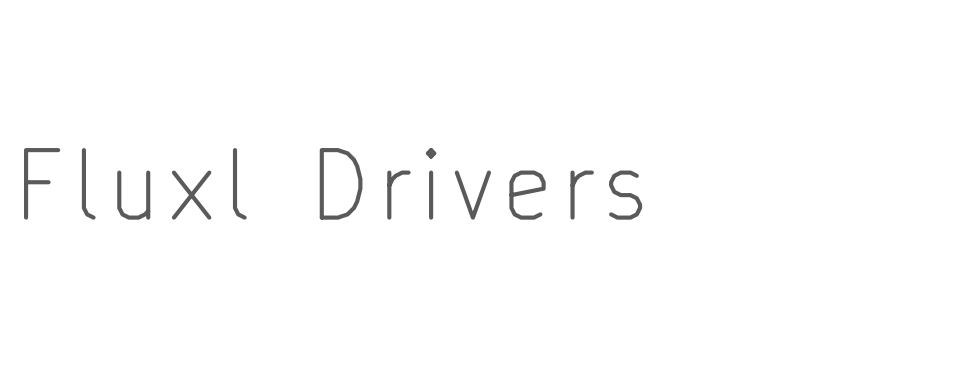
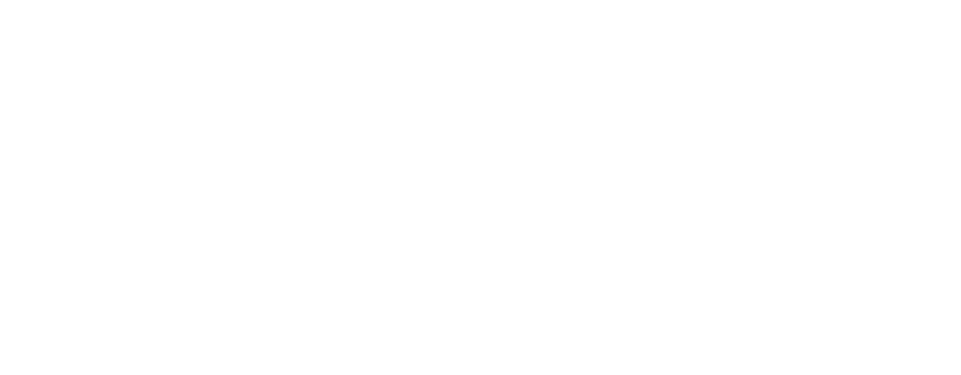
text: Fluxl Drivers (333, 183) -> none

